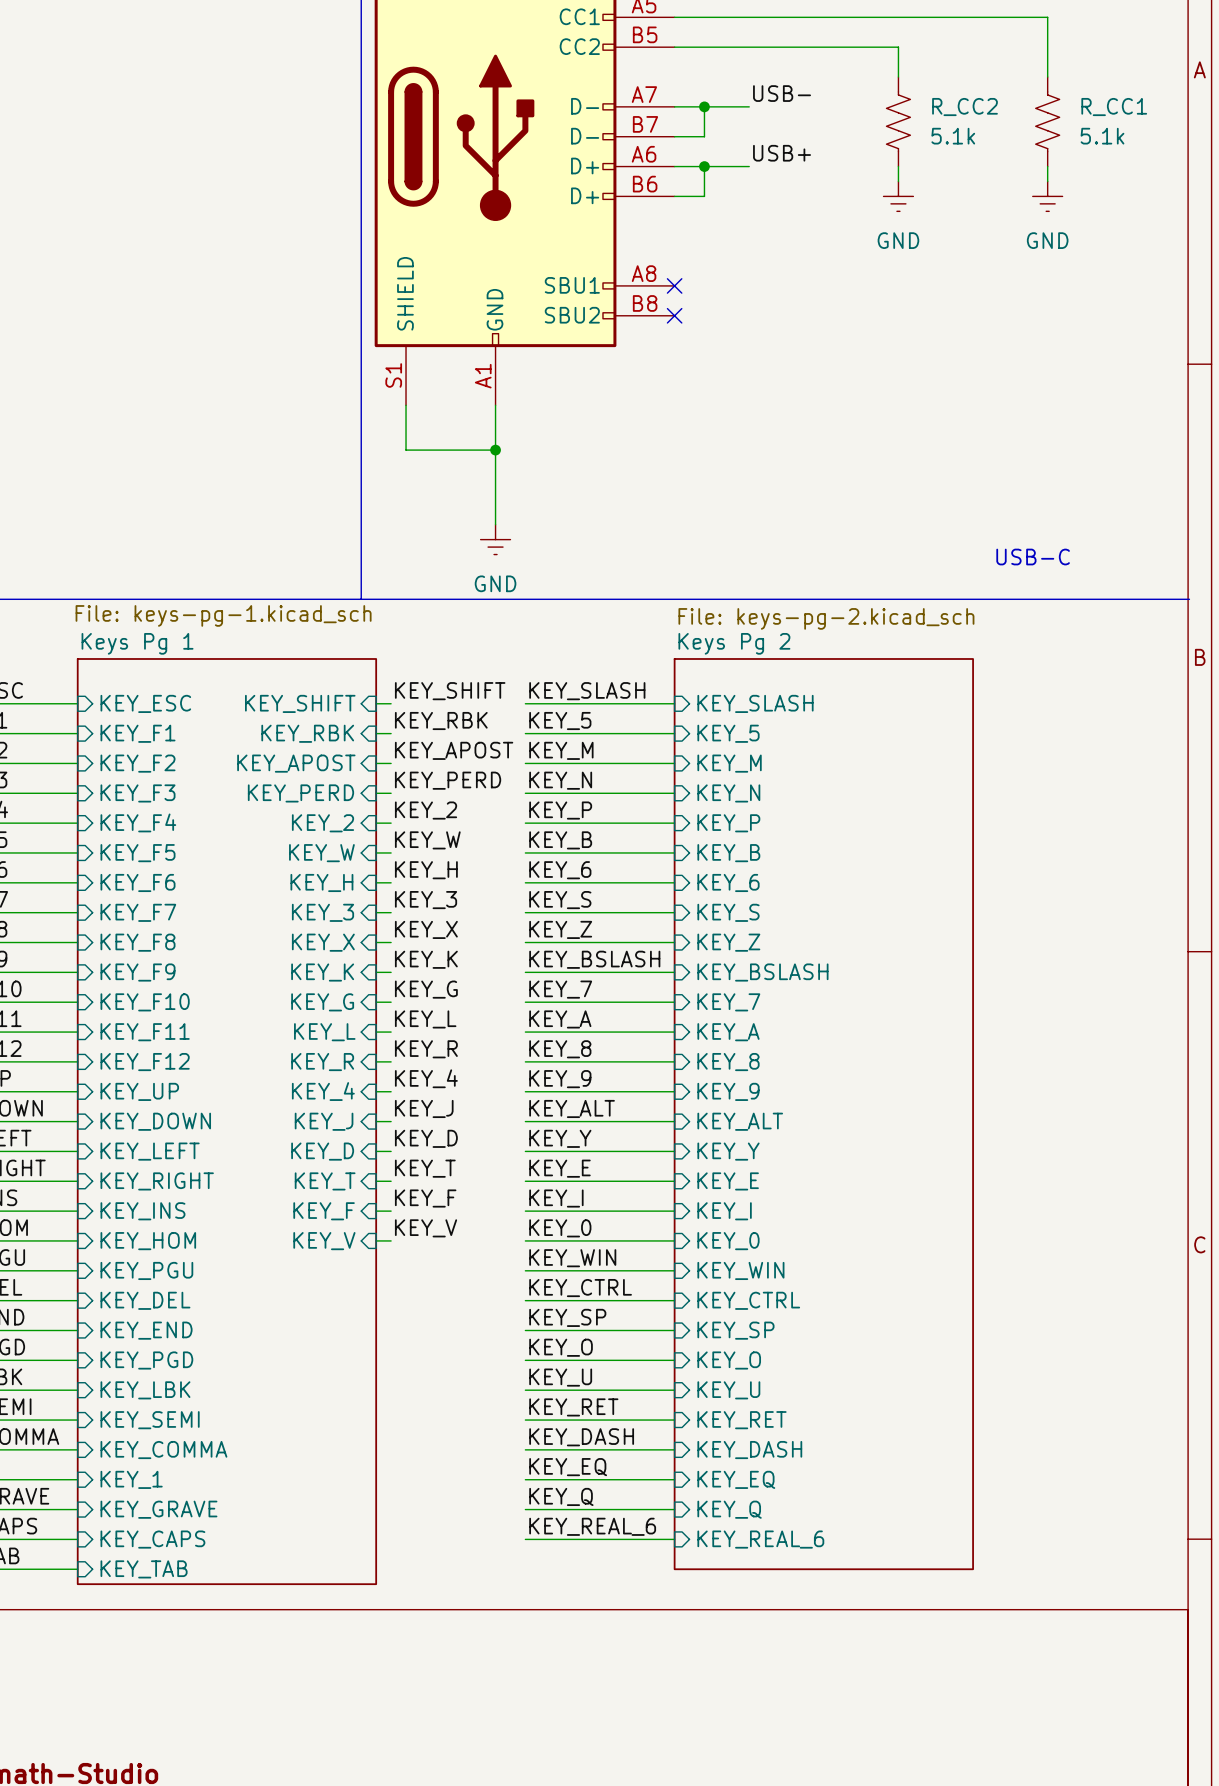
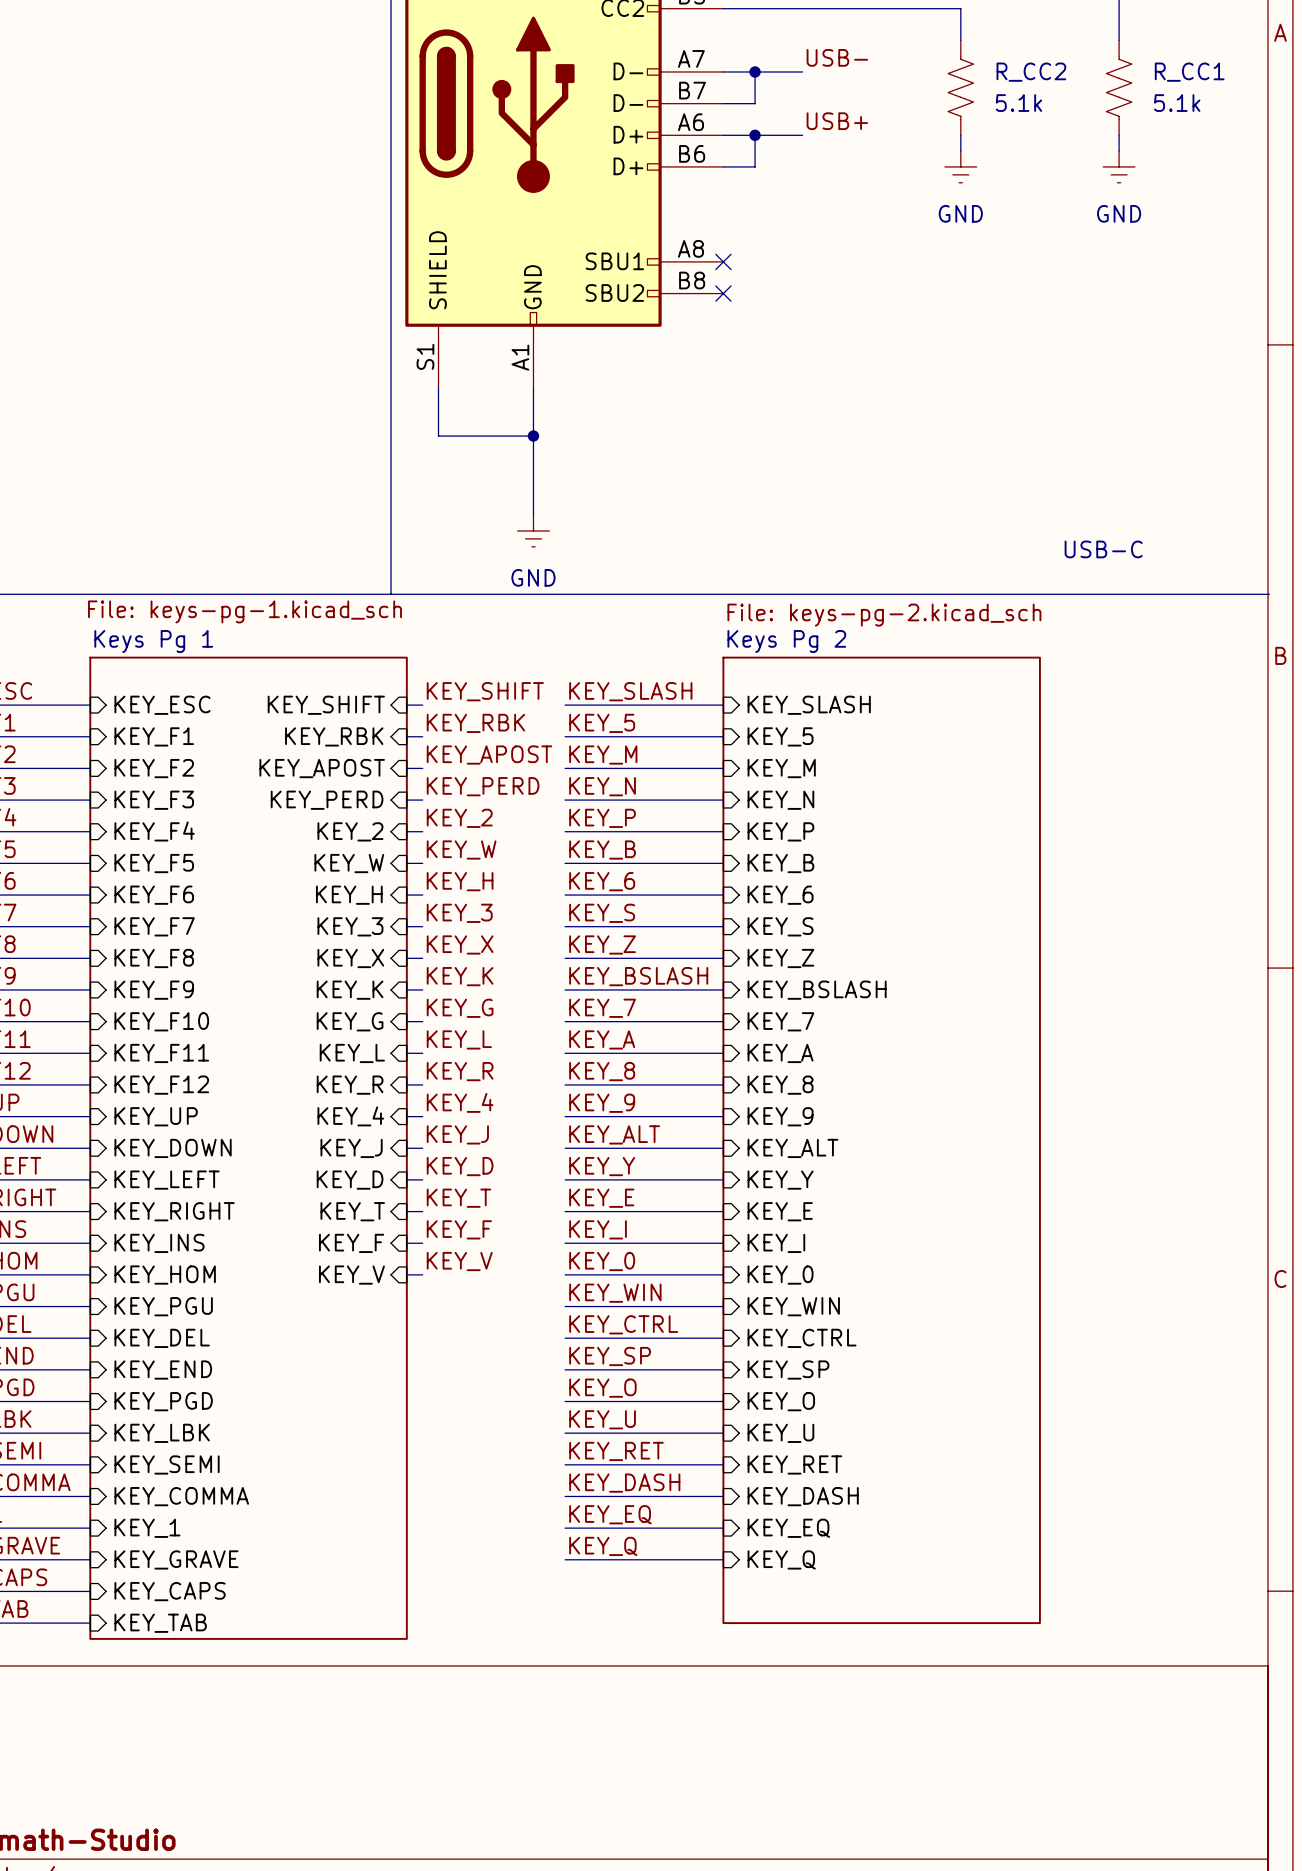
label: KEY_REAL_6 (592, 1526) -> none
wire: (525, 1539) (674, 1539) -> none
sheet pin: KEY_REAL_6 (760, 1539) -> none

